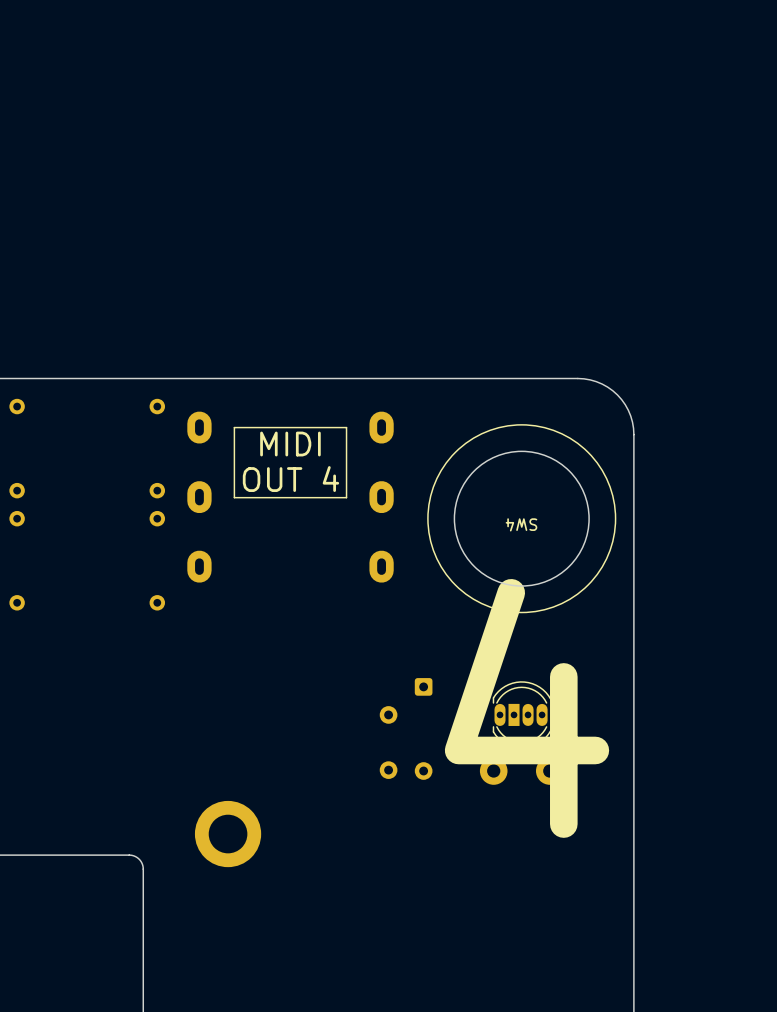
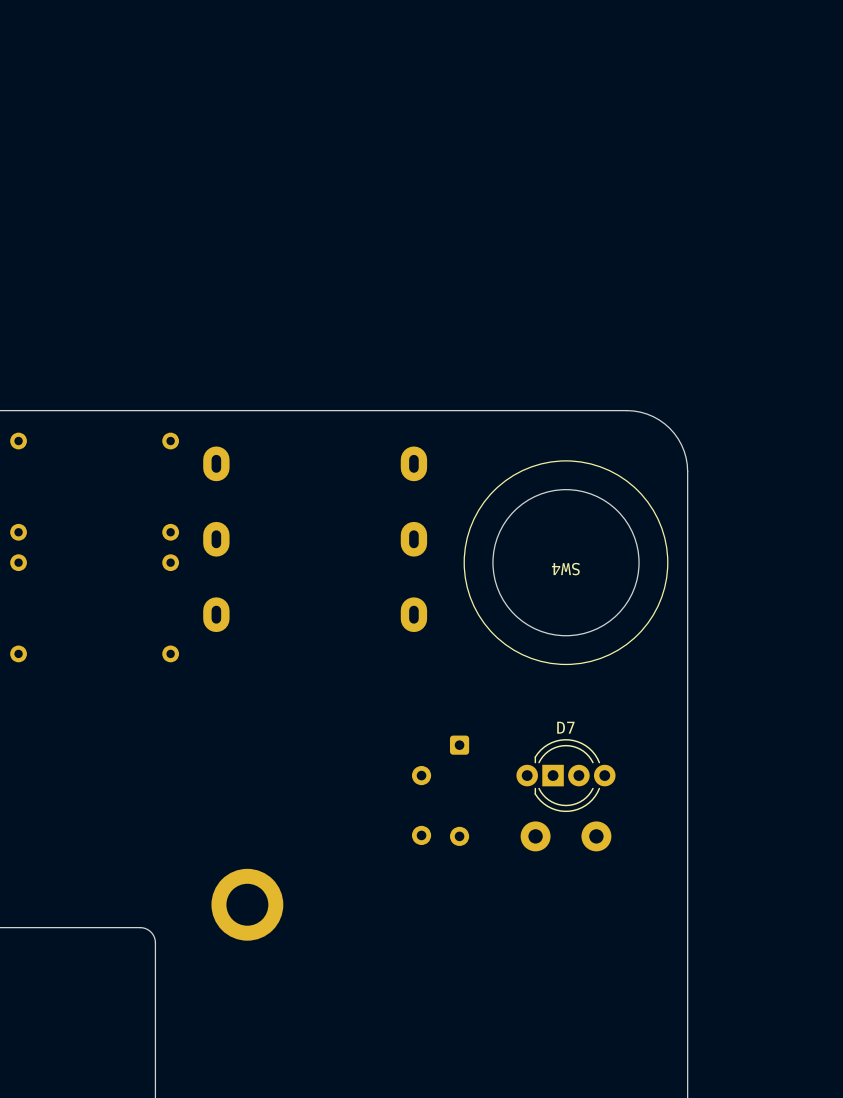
line: (234, 427) (346, 427) (346, 497) (234, 497) (234, 427) -> none
text: MIDI (290, 444) -> none
text: OUT 4 (290, 479) -> none
text: 4 (527, 708) -> none
D7: none -> (565, 775)
part: (522, 714) -> none

